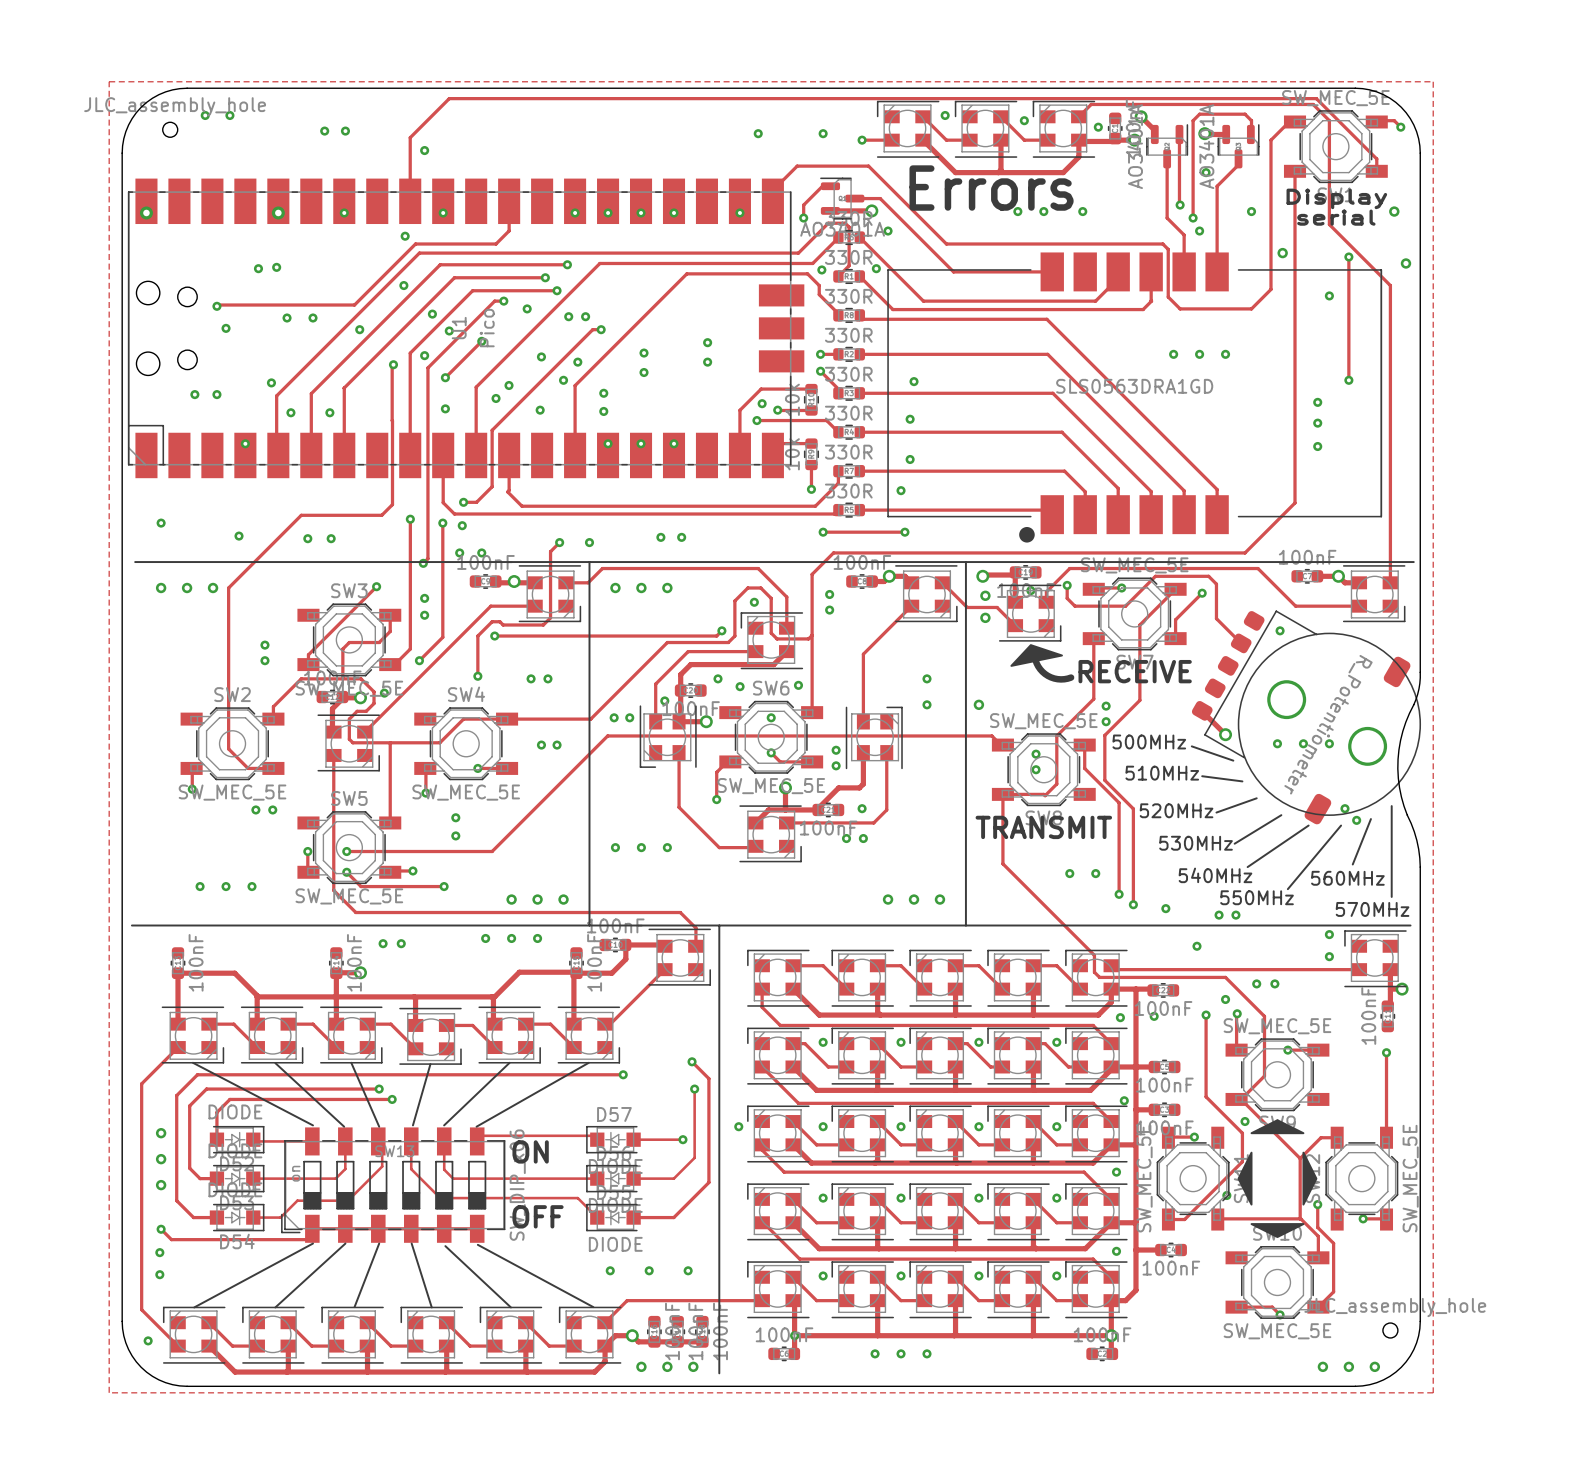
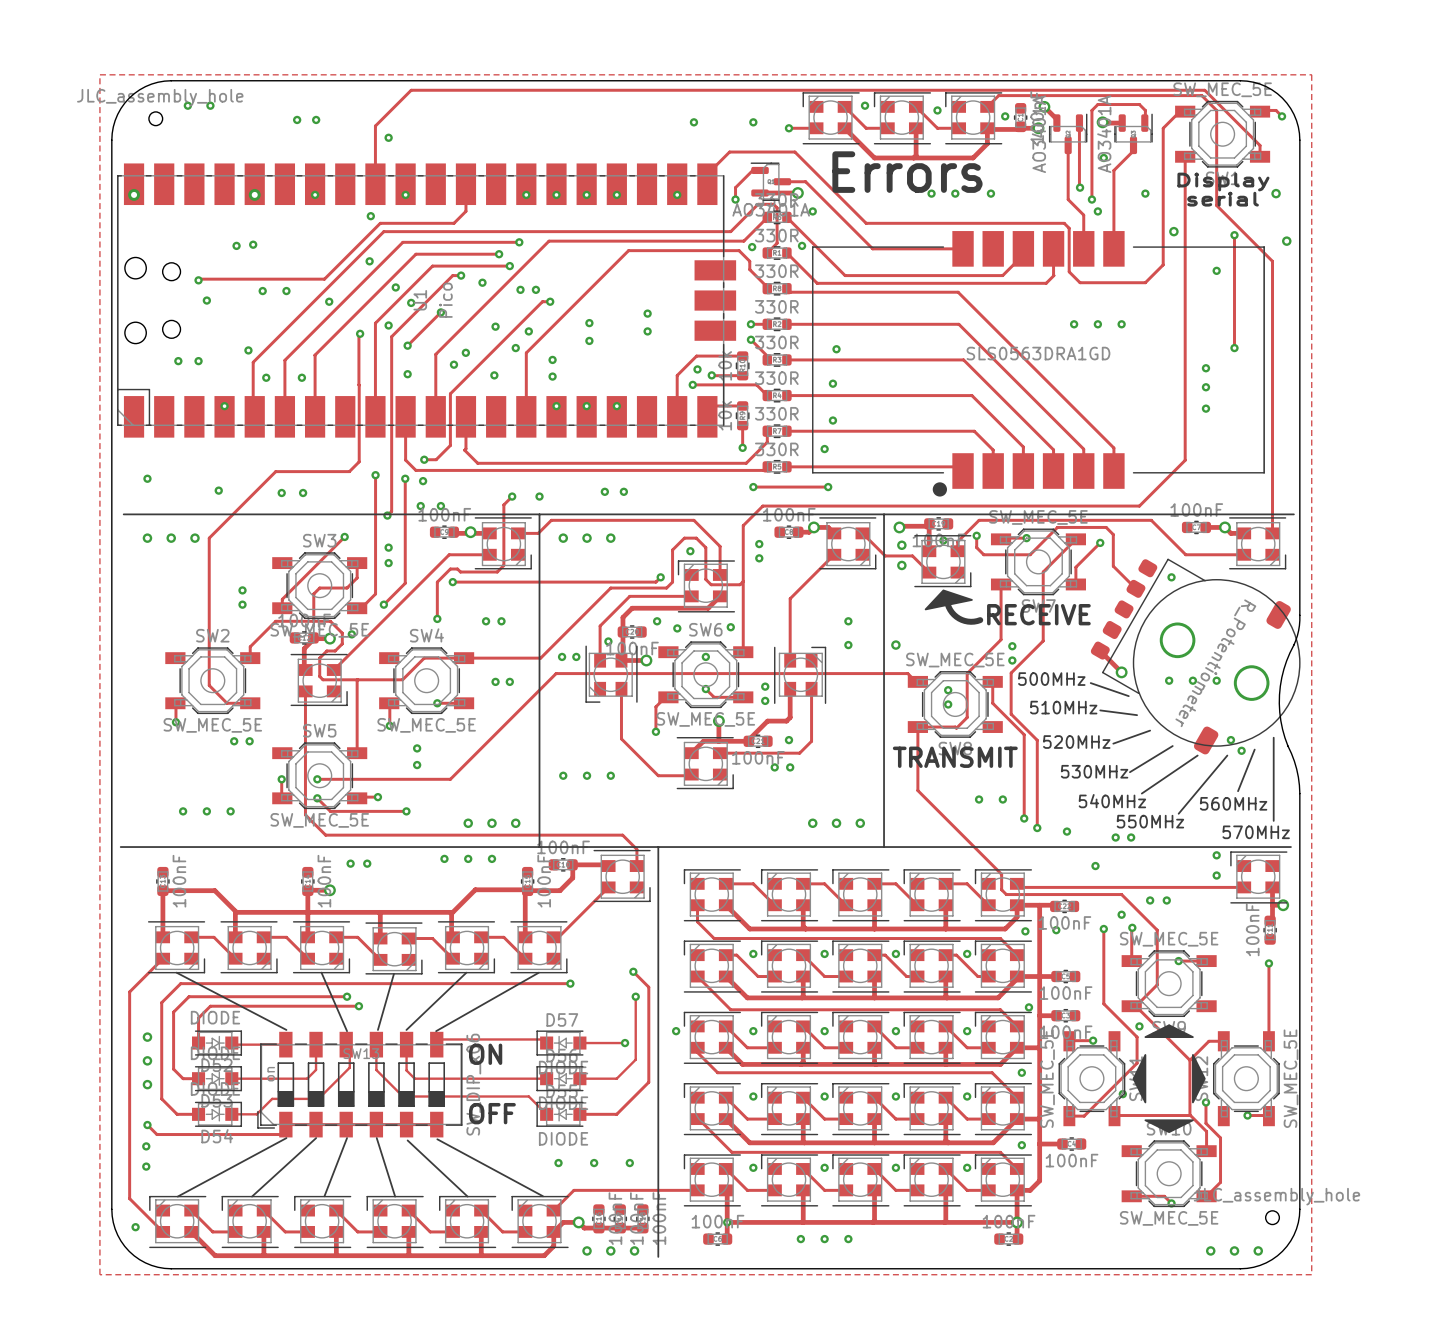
line: (275, 1063) (344, 1126) -> none

